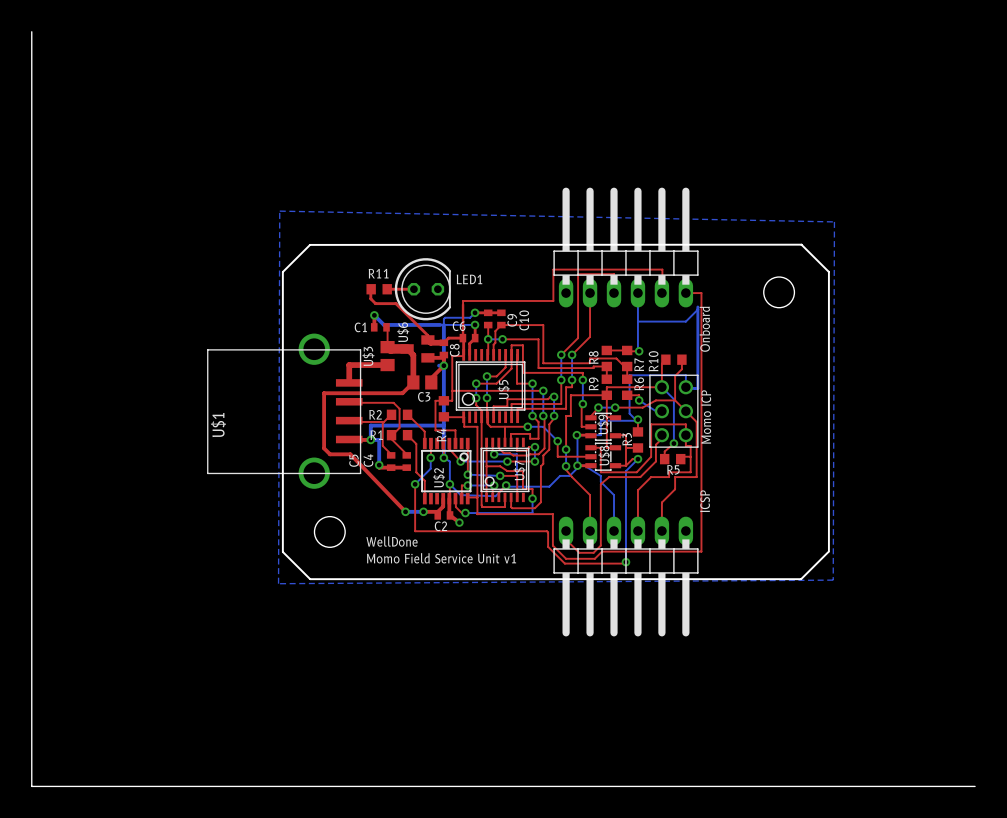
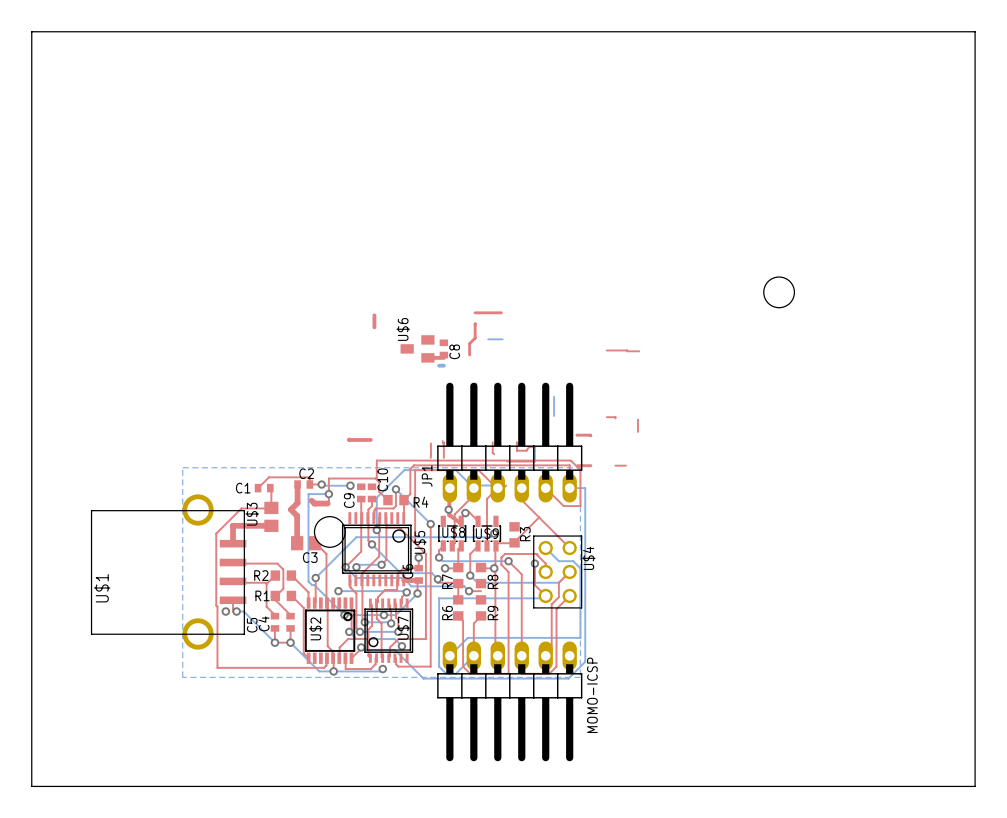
board edge: none -> (31, 31) (975, 31) (975, 786)
bottom zone outline: (279, 211) (834, 221) (833, 580) (278, 583) (279, 211) -> none
board edge: (310, 244) (282, 271) (282, 552) -> none
board edge: (801, 244) (828, 271) -> none
board edge: (801, 244) (310, 244) -> none
part: (625, 247) -> none
board edge: (828, 271) (828, 551) -> none
top track: (371, 289) (370, 298) (375, 303) (395, 303) (427, 335) (427, 339) (430, 342) (443, 342) (448, 338) (463, 338) (463, 356) (452, 356) (452, 400) (435, 400) (435, 430) (455, 430) (455, 443) -> none
R11: (379, 289) -> none
top track: (387, 289) (413, 289) -> none
LED1: (422, 289) -> none
top track: (590, 293) (590, 336) (572, 354) -> none
top track: (614, 293) (614, 274) (578, 274) (578, 338) (561, 354) -> none
bottom track: (637, 293) (639, 351) -> none
top track: (661, 293) (662, 269) (553, 269) (553, 300) (463, 300) (463, 338) -> none
top track: (685, 293) (701, 293) (701, 551) (602, 551) (594, 558) (566, 558) (552, 545) (552, 514) (477, 514) (477, 426) (464, 426) (464, 417) (443, 416) -> none
bottom track: (697, 306) (697, 388) (685, 388) (685, 375) (629, 375) (629, 413) (637, 421) (637, 419) -> none
bottom track: (697, 309) (685, 321) (637, 321) -> none
bottom track: (475, 312) (470, 317) (443, 318) (443, 457) (449, 461) (449, 484) (460, 495) (495, 496) (506, 485) (549, 486) (560, 475) (569, 475) (577, 465) -> none
via: (475, 312) -> none
bottom track: (374, 315) (383, 324) (440, 324) -> none
via: (374, 315) -> none
C9 position: (488, 318) -> (361, 492)
C10 position: (501, 318) -> (372, 492)
C9 name position: C9 (512, 320) -> C9 (349, 500)
C10 name position: C10 (524, 320) -> C10 (382, 479)
bottom track: (439, 324) (475, 324) -> none
via: (475, 324) -> none
top track: (488, 325) (487, 354) -> none
C1 position: (380, 327) -> (264, 488)
top track: (386, 327) (387, 347) (407, 348) (413, 355) (413, 382) (402, 393) (324, 393) (324, 448) (330, 454) (350, 454) (405, 511) -> none
text: Onboard (704, 329) -> none
C6 rotation: 0° (469, 338) -> 90° clockwise (418, 574)
C6 position: (469, 338) -> (418, 574)
via: (488, 339) -> none
top track: (502, 339) (538, 339) (538, 368) (606, 366) (606, 379) -> none
via: (502, 339) -> none
via: (639, 351) -> none
top track: (443, 354) (443, 365) (431, 377) (431, 382) -> none
top track: (493, 354) (495, 331) (501, 325) (543, 325) (543, 363) (590, 363) (590, 358) (616, 358) (624, 366) (627, 366) (627, 379) -> none
top track: (505, 354) (505, 367) (496, 376) (487, 376) -> none
top track: (517, 354) (516, 383) (532, 383) -> none
bottom track: (561, 354) (561, 380) -> none
via: (561, 354) -> none
bottom track: (572, 354) (572, 380) -> none
via: (572, 354) -> none
U$3 position: (387, 356) -> (271, 516)
R8 name position: R8 (593, 357) -> R8 (493, 581)
R8 position: (606, 358) -> (481, 575)
R7 position: (627, 358) -> (458, 575)
top track: (665, 359) (661, 363) (661, 387) (606, 387) (606, 447) (615, 447) -> none
R10: (673, 359) -> none
top track: (681, 359) (681, 369) (675, 376) (675, 400) -> none
R7 name position: R7 (639, 364) -> R7 (447, 581)
top track: (387, 365) (349, 365) (349, 382) -> (271, 525) (233, 525) (233, 543)
via: (443, 365) -> none
bottom track: (487, 376) (487, 398) -> none
via: (487, 376) -> none
top track: (561, 380) (561, 404) (511, 404) (511, 417) -> none
via: (561, 380) -> none
top track: (572, 380) (572, 387) (566, 387) (566, 408) (517, 408) (517, 417) -> none
via: (572, 380) -> none
top track: (582, 380) (582, 372) (522, 372) (522, 345) (511, 345) (511, 368) (496, 383) (476, 383) -> none
bottom track: (582, 380) (582, 404) -> none
via: (582, 380) -> none
C3 position: (422, 382) -> (306, 543)
via: (476, 383) -> none
bottom track: (532, 383) (532, 415) -> none
via: (532, 383) -> none
R9 name position: R9 (593, 383) -> R9 (493, 613)
R6 name position: R6 (639, 383) -> R6 (447, 613)
U$5 rotation: 0° (490, 386) -> 180° (376, 549)
U$5 position: (490, 386) -> (376, 549)
R9 position: (606, 387) -> (481, 607)
R6 position: (627, 387) -> (458, 607)
bottom track: (661, 387) (673, 399) (673, 443) -> none
U$5 name position: U$5 (503, 389) -> U$5 (419, 542)
top track: (452, 390) (543, 390) -> none
bottom track: (543, 390) (543, 415) -> none
via: (543, 390) -> none
top track: (606, 395) (570, 395) (570, 415) (566, 415) (566, 449) -> none
top track: (627, 395) (639, 395) (639, 400) -> none
top track: (554, 396) (548, 399) (507, 399) (507, 406) (493, 406) (493, 417) -> none
via: (554, 396) -> none
top track: (476, 398) (476, 405) (481, 410) (482, 507) (504, 507) (504, 497) -> none
via: (476, 398) -> none
top track: (487, 398) (487, 423) (490, 426) (527, 426) -> none
via: (487, 398) -> none
bottom track: (639, 400) (655, 411) (661, 411) -> none
via: (639, 400) -> none
top track: (675, 400) (655, 400) (642, 407) (615, 407) -> none
top track: (675, 400) (696, 421) (696, 477) (675, 477) (675, 489) (661, 502) (661, 531) -> none
top track: (349, 401) (393, 402) (399, 408) (399, 427) (392, 435) -> (233, 562) (277, 563) (283, 569) (283, 588) (276, 595)
top track: (582, 404) (581, 426) (590, 426) -> none
via: (582, 404) -> none
top track: (598, 407) (590, 417) -> none
bottom track: (598, 407) (615, 407) -> none
via: (598, 407) -> none
via: (615, 407) -> none
R4 rotation: 0° (443, 408) -> 90° clockwise (395, 500)
R4 position: (443, 408) -> (395, 500)
U$1 position: (284, 411) -> (168, 571)
part: (673, 411) -> none
top track: (391, 414) (382, 423) (382, 445) (391, 455) -> (275, 575) (266, 583) (266, 606) (274, 616)
R2 position: (399, 414) -> (283, 575)
top track: (407, 414) (424, 431) (424, 443) -> none
top track: (532, 415) (538, 421) (538, 438) (530, 438) (530, 433) (510, 433) (510, 442) -> none
via: (532, 415) -> none
top track: (543, 415) (544, 448) (538, 454) (513, 455) (503, 453) (498, 448) (498, 442) -> none
via: (543, 415) -> none
top track: (554, 415) (549, 424) (549, 449) (543, 455) (543, 463) (540, 466) (540, 502) (534, 508) (512, 508) (511, 497) -> none
via: (554, 415) -> none
text: Momo ICP (706, 417) -> none
via: (637, 419) -> none
top track: (349, 420) (383, 422) -> (233, 581) (267, 583)
bottom track: (637, 420) (600, 420) (600, 435) (576, 435) -> none
bottom track: (443, 425) (370, 425) (370, 439) (379, 439) (379, 465) -> none
top track: (504, 426) (504, 442) -> none
bottom track: (527, 426) (543, 426) (557, 441) -> none
via: (527, 426) -> none
U$9 rotation: 0° (603, 426) -> 90° counterclockwise (487, 533)
U$9 position: (603, 426) -> (487, 533)
top track: (392, 435) (392, 439) (406, 455) -> (276, 595) (276, 600) (290, 616)
R1 position: (399, 435) -> (283, 595)
top track: (407, 435) (416, 443) (416, 472) (424, 480) (424, 498) -> none
R4 name position: R4 (441, 435) -> R4 (420, 502)
via: (576, 435) -> none
bottom track: (577, 435) (577, 465) -> none
top track: (615, 435) (625, 435) (625, 465) (632, 459) (637, 459) -> none
top track: (661, 435) (661, 438) (655, 444) (655, 461) (640, 477) (609, 477) (600, 484) (600, 545) (593, 552) (579, 552) (566, 539) (566, 531) -> none
via: (370, 439) -> none
R3 name position: R3 (627, 439) -> R3 (525, 534)
R3 position: (637, 439) -> (514, 534)
top track: (557, 441) (557, 456) (590, 456) -> none
via: (557, 441) -> none
top track: (486, 442) (486, 497) -> none
JP1: none -> (509, 442)
top track: (449, 443) (449, 449) (460, 461) -> none
top track: (467, 443) (467, 474) -> none
top track: (673, 443) (664, 451) (664, 459) -> none
via: (673, 443) -> none
via: (534, 447) -> none
top track: (590, 447) (600, 447) (600, 472) (636, 472) (651, 456) (651, 424) (685, 424) (685, 445) (690, 445) (690, 472) (669, 472) (669, 477) (651, 477) (637, 490) (637, 531) -> none
top track: (637, 447) (625, 448) -> none
bottom track: (566, 449) (566, 466) -> none
via: (566, 449) -> none
bottom track: (494, 454) (516, 454) (516, 486) -> none
via: (494, 454) -> none
U$8 rotation: 0° (603, 456) -> 90° counterclockwise (452, 533)
U$8 position: (603, 456) -> (452, 533)
top track: (690, 456) (683, 456) (680, 459) -> none
bottom track: (430, 457) (430, 468) (415, 484) -> none
via: (430, 457) -> none
via: (443, 457) -> none
bottom track: (637, 459) (625, 471) (625, 562) -> none
via: (637, 459) -> none
R5: (672, 459) -> none
C5 name position: C5 (354, 460) -> C5 (252, 625)
C4 name position: C4 (368, 460) -> C4 (263, 623)
C5 position: (391, 461) -> (274, 622)
C4 position: (406, 461) -> (290, 622)
bottom track: (460, 461) (507, 461) -> none
via: (460, 461) -> none
via: (507, 461) -> none
via: (534, 461) -> none
top track: (379, 465) (379, 467) (406, 467) -> none
via: (379, 465) -> none
bottom track: (577, 465) (584, 465) (600, 475) (600, 481) (614, 495) (614, 531) -> none
via: (577, 465) -> none
top track: (486, 466) (500, 466) (507, 471) (522, 471) (522, 489) (532, 489) (532, 498) -> none
top track: (566, 466) (566, 469) (572, 477) (590, 495) (590, 531) -> none
via: (566, 466) -> none
bottom zone outline: none -> (182, 467) (580, 467) (580, 677) (182, 677) (182, 467)
U$7 position: (504, 469) -> (388, 630)
U$2 position: (446, 471) -> (330, 630)
bottom track: (467, 474) (500, 475) -> none
via: (467, 474) -> none
top track: (500, 475) (517, 475) (517, 497) -> none
via: (500, 475) -> none
U$2 name position: U$2 (438, 477) -> U$2 (315, 628)
top track: none -> (376, 479) (376, 460) (570, 460) (580, 470) (580, 506) (563, 506) (545, 488)
top track: none -> (297, 484) (297, 503) (290, 509) (297, 515) (297, 543)
top track: none -> (321, 484) (309, 484) (309, 477) (268, 477) (258, 488)
bottom track: none -> (321, 484) (350, 485)
via: none -> (321, 484)
top track: none -> (415, 484) (415, 470) (478, 470) (497, 488) (487, 498) (487, 545)
via: (415, 484) -> none
via: (449, 484) -> none
via: none -> (350, 485)
top track: (467, 485) (461, 485) (461, 498) -> none
via: (467, 485) -> none
via: (494, 485) -> none
via: (506, 485) -> none
top track: none -> (270, 488) (271, 507) (241, 508) (216, 533) (217, 667) (324, 667) (326, 665) (327, 658)
top track: none -> (473, 488) (473, 495) (454, 514) (454, 543) (452, 545)
bottom track: none -> (473, 488) (455, 470) (404, 470) (376, 497) (376, 530)
top track: none -> (521, 488) (521, 500) (569, 548)
top track: none -> (569, 488) (569, 465) (413, 465) (410, 468) (410, 494) (403, 500) (403, 518)
bottom track: none -> (569, 488) (585, 488) (585, 661) (568, 678) (423, 678) (394, 649) (363, 649) (361, 647)
top track: none -> (395, 489) (395, 506) (393, 508) (375, 508) (373, 518)
bottom track: none -> (395, 489) (430, 524)
via: none -> (395, 489)
bottom track: none -> (328, 494) (308, 494) (308, 581) (344, 615) (395, 615) (417, 593)
via: none -> (328, 494)
top track: (443, 498) (443, 506) (437, 511) -> none
top track: (455, 498) (455, 507) (461, 513) (465, 513) -> none
bottom track: (532, 498) (532, 513) (465, 513) -> none
via: (532, 498) -> none
top track: none -> (361, 499) (361, 551) (345, 567)
top track: none -> (372, 499) (372, 506) (368, 509) (368, 540) (372, 544)
top track: none -> (387, 500) (379, 491) (379, 482) (375, 478) (328, 478) (327, 503) (314, 503) (311, 500)
text: ICSP (705, 501) -> none
via: none -> (448, 509)
bottom track: (405, 511) (423, 511) -> none
via: (405, 511) -> none
top track: (423, 511) (437, 511) -> none
via: (423, 511) -> none
top track: none -> (469, 512) (478, 521)
C2 position: (443, 515) -> (303, 484)
top track: none -> (539, 517) (514, 543) (496, 543) (494, 568)
top track: none -> (379, 518) (379, 556) (362, 573) (362, 619) (364, 622)
top track: none -> (385, 518) (386, 560) (381, 564)
via: (459, 522) -> none
top track: none -> (430, 524) (430, 666) (398, 666) (394, 658)
via: none -> (430, 524)
C2 name position: C2 (440, 526) -> C2 (306, 473)
top track: none -> (386, 527) (399, 527) (425, 554) (425, 639) (398, 639) (389, 647) (388, 658)
via: none -> (376, 530)
top track: (415, 531) (546, 531) (548, 546) (564, 563) (625, 562) -> (415, 531) (414, 542)
bottom track: none -> (494, 533) (490, 537) (356, 537) (315, 577)
via: none -> (494, 533)
text: WellDone (391, 541) -> none
top track: none -> (315, 543) (326, 554) (327, 646) (332, 651) (333, 671)
bottom track: none -> (372, 544) (400, 573) (431, 573) (437, 579)
via: none -> (372, 544)
top track: none -> (443, 545) (439, 550) (439, 557)
top track: none -> (461, 545) (458, 549) (458, 568) (445, 568)
top track: none -> (478, 545) (470, 554) (470, 575)
bottom track: none -> (545, 548) (558, 561) (573, 561) (580, 568) (580, 637) (467, 637) (449, 655)
board edge: (282, 552) (310, 579) -> none
board edge: (828, 552) (801, 579) (310, 579) -> none
top track: none -> (418, 557) (418, 568) (403, 568) (398, 573) (397, 589) (385, 589) (377, 597) (376, 618) (381, 623) (382, 658)
via: none -> (418, 557)
bottom track: none -> (439, 557) (442, 561) (508, 561)
via: none -> (439, 557)
text: Momo Field Service Unit v1 (441, 558) -> none
top track: none -> (508, 561) (521, 574) (521, 673) (549, 673) (556, 666) (556, 609) (569, 595)
via: none -> (508, 561)
via: (625, 562) -> none
top track: none -> (534, 563) (534, 585) (545, 595)
via: none -> (534, 563)
bottom track: none -> (381, 564) (358, 564) (356, 567)
via: none -> (381, 564)
bottom track: none -> (345, 567) (356, 577) (403, 577) (411, 586) (464, 586) (469, 591)
via: none -> (345, 567)
via: none -> (356, 567)
top track: none -> (481, 567) (495, 568) (495, 653) (497, 655)
via: none -> (445, 568)
via: none -> (494, 568)
top track: none -> (545, 571) (545, 563) (537, 554) (504, 554) (501, 557) (501, 564) (508, 571) (508, 673) (470, 673) (463, 666) (463, 621) (458, 615)
U$4: none -> (557, 571)
top track: none -> (569, 571) (558, 582) (558, 597) (551, 604) (551, 649) (545, 655)
bottom track: none -> (569, 571) (558, 582) (477, 582) (470, 575)
top track: none -> (291, 575) (308, 592) (308, 603)
via: none -> (470, 575)
part: (625, 576) -> none
top track: none -> (315, 577) (314, 603)
via: none -> (315, 577)
top track: none -> (437, 579) (437, 582) (458, 582) (458, 599)
via: none -> (437, 579)
top track: none -> (349, 580) (350, 587) (356, 593) (356, 628) (360, 631)
top track: none -> (403, 580) (418, 580) (417, 593)
bottom track: none -> (338, 591) (406, 592)
via: none -> (338, 591)
top track: none -> (469, 591) (481, 591)
via: none -> (469, 591)
top track: none -> (406, 592) (401, 597) (401, 603)
via: none -> (406, 592)
via: none -> (417, 593)
top track: none -> (291, 595) (303, 607) (303, 653) (308, 658)
bottom track: none -> (545, 595) (543, 598) (439, 598) (439, 666) (446, 673) (455, 673) (473, 655)
top track: none -> (233, 600) (233, 611)
top track: none -> (351, 603) (351, 629) (349, 631)
top track: none -> (370, 603) (372, 625) (368, 629) (368, 655) (370, 658)
top track: none -> (388, 603) (391, 623)
top track: none -> (394, 603) (398, 631)
via: none -> (225, 611)
bottom track: none -> (236, 611) (243, 611) (274, 642)
via: none -> (236, 611)
via: none -> (344, 615)
via: none -> (383, 615)
top track: none -> (481, 615) (473, 623) (473, 655)
bottom track: none -> (364, 622) (391, 623)
via: none -> (364, 622)
via: none -> (391, 623)
top track: none -> (274, 628) (274, 642) (290, 642) (290, 628)
bottom track: none -> (349, 631) (356, 639) (394, 639) (401, 646)
via: none -> (349, 631)
bottom track: none -> (360, 631) (398, 631)
via: none -> (360, 631)
via: none -> (398, 631)
top track: none -> (368, 639) (348, 639) (339, 647) (339, 658)
via: none -> (274, 642)
bottom track: none -> (290, 642) (319, 671) (380, 671) (382, 669)
via: none -> (290, 642)
via: none -> (401, 646)
top track: none -> (361, 647) (351, 658)
via: none -> (361, 647)
top track: none -> (345, 658) (345, 669) (370, 669) (375, 664) (376, 658)
via: none -> (382, 669)
via: none -> (333, 671)
MOMO-ICSP: none -> (509, 701)

